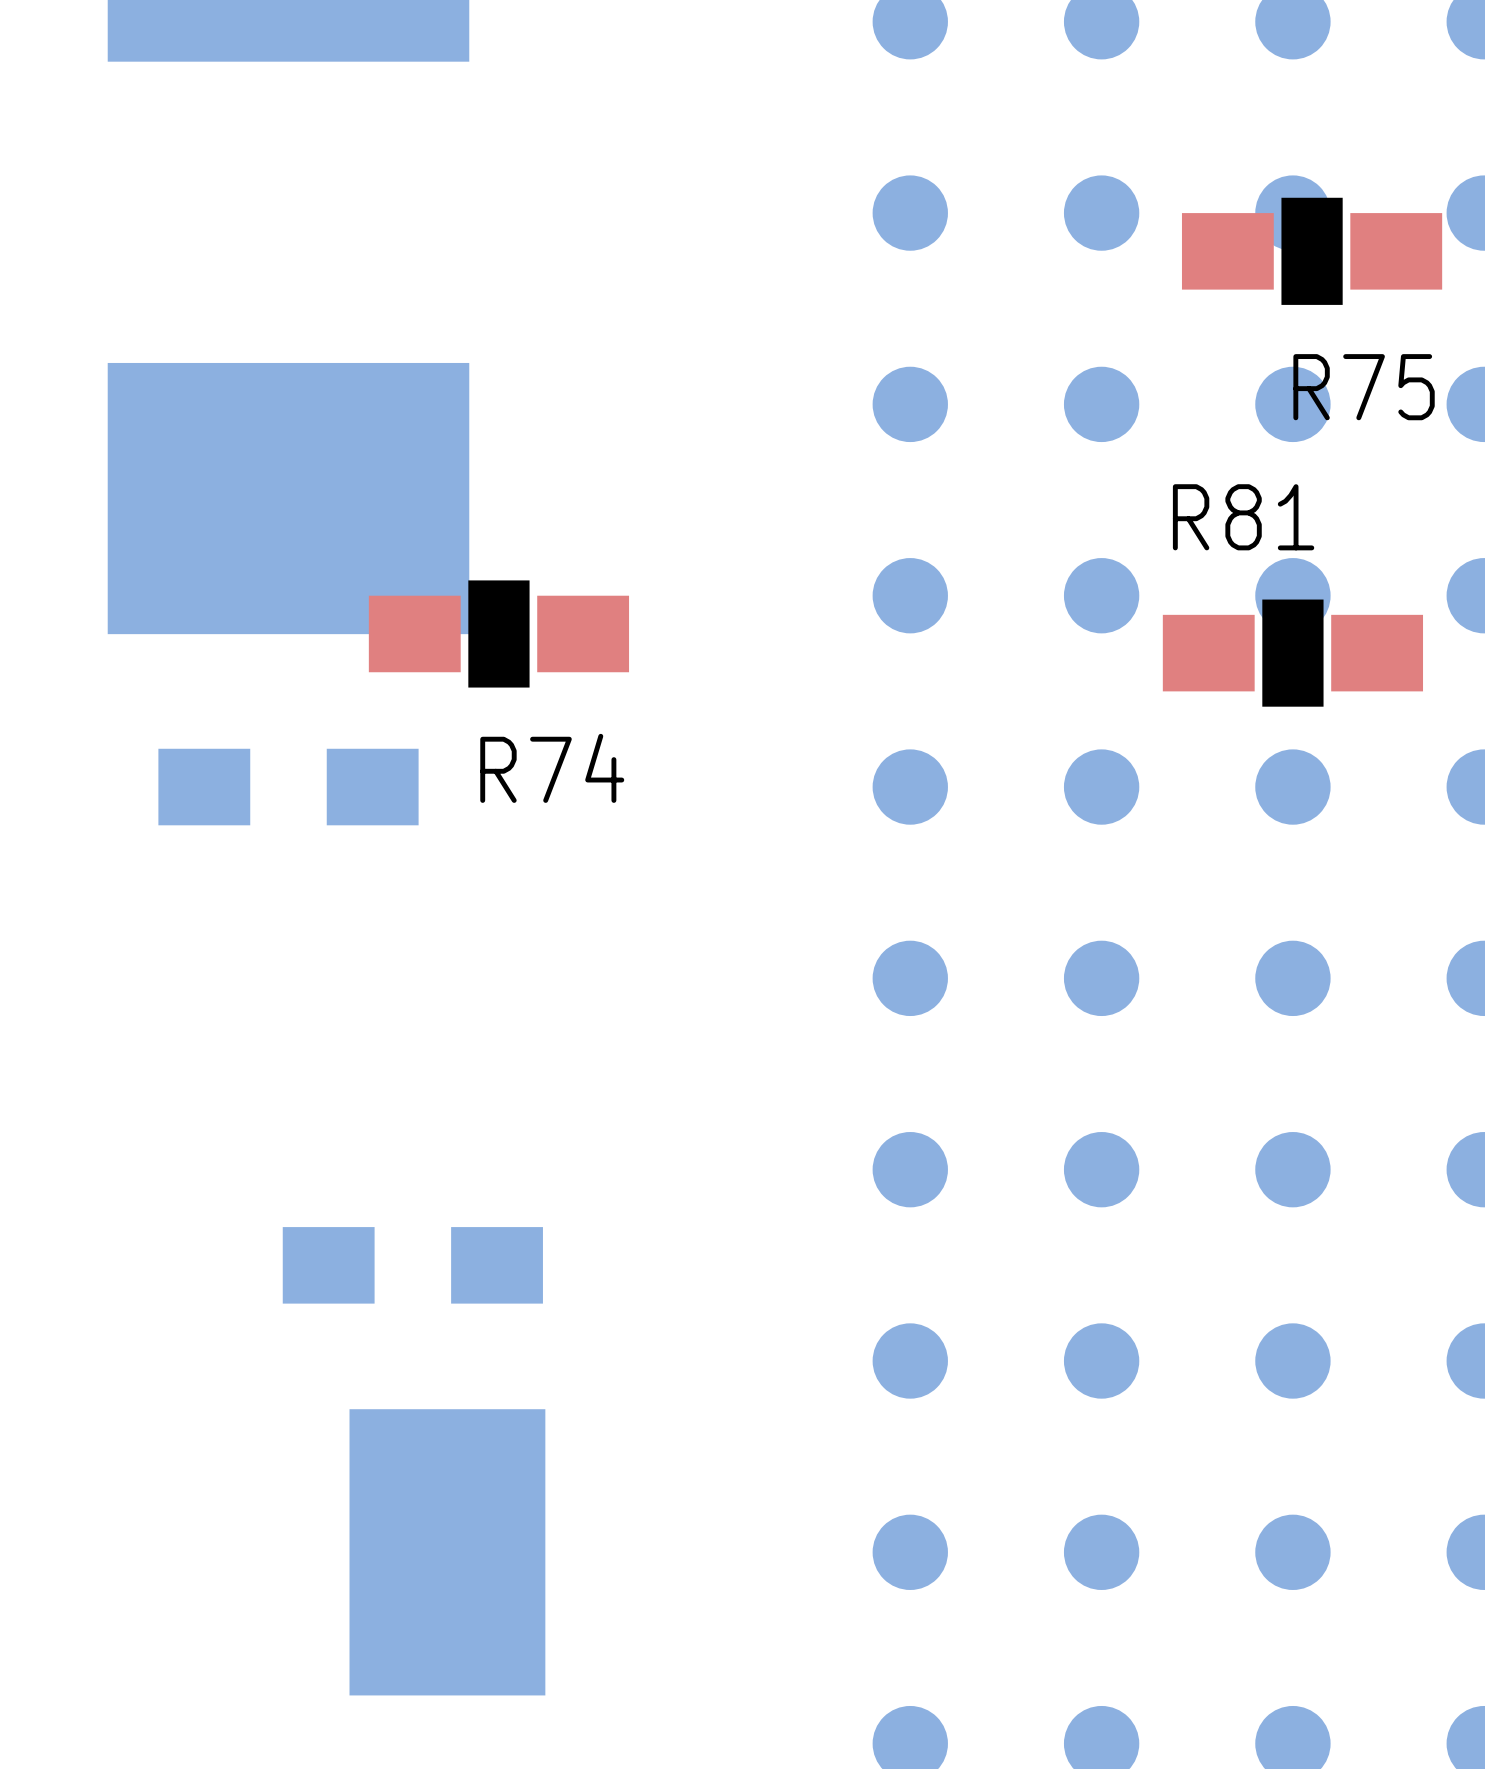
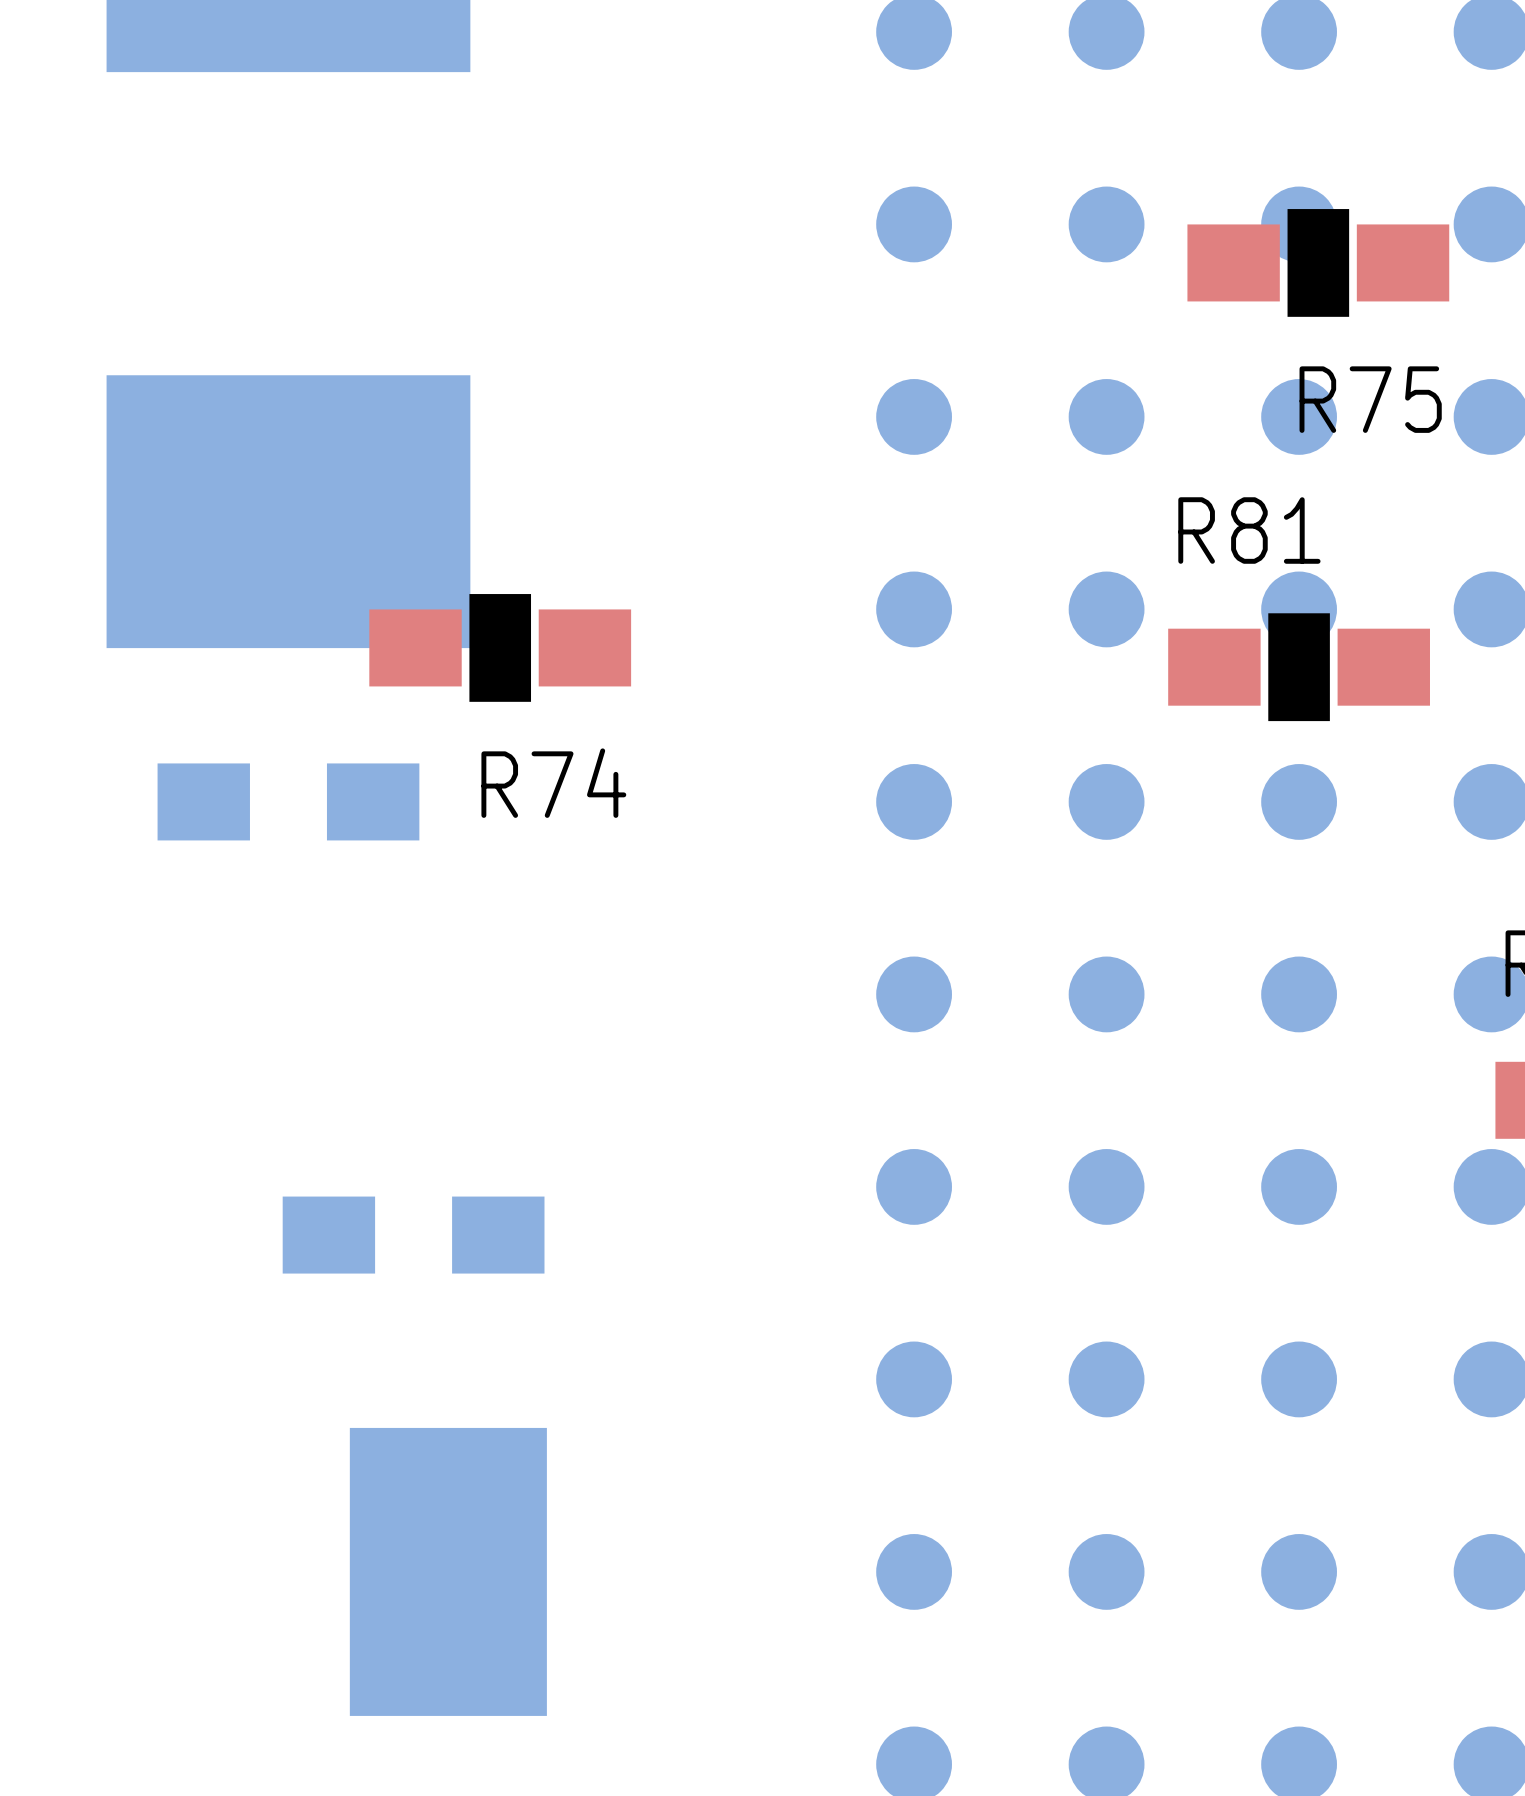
part position: (412, 1265) -> (413, 1235)

